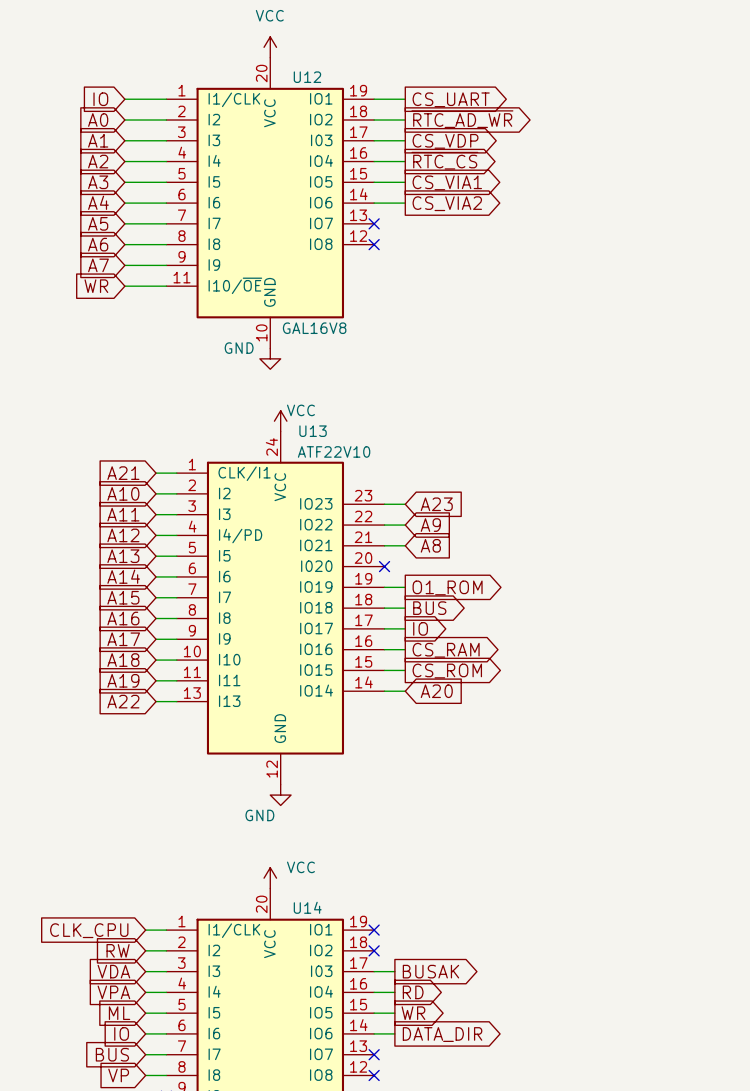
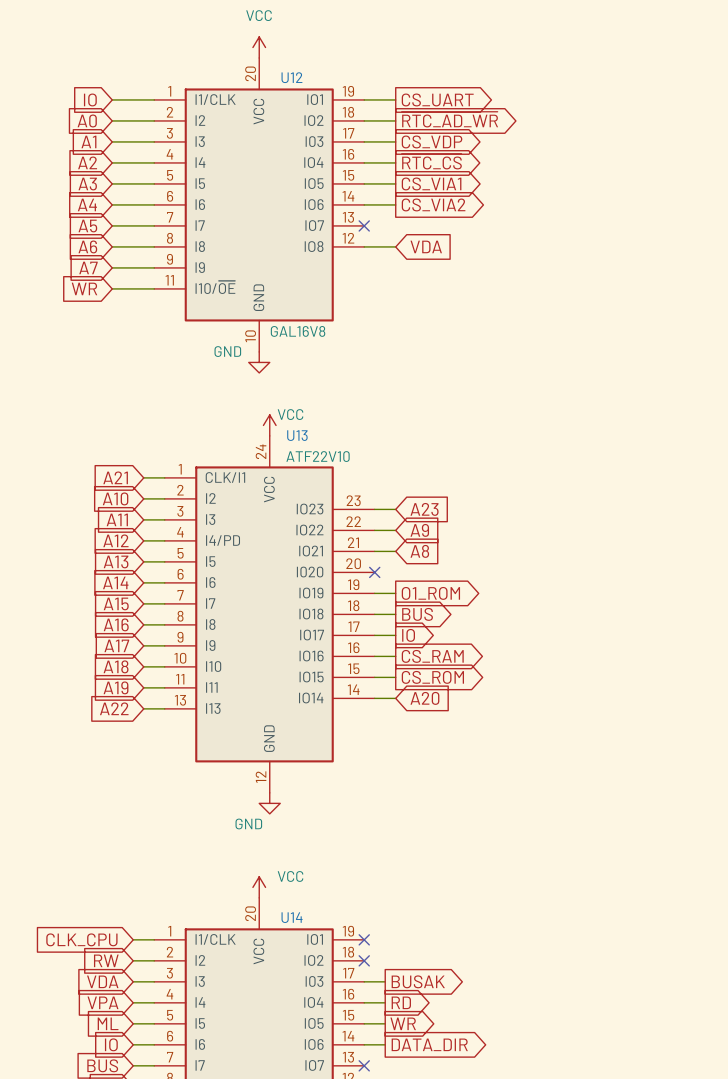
wire: none -> (364, 246) (395, 246)
no-connect mark: (374, 244) -> none
global label: none -> VDA (426, 246)

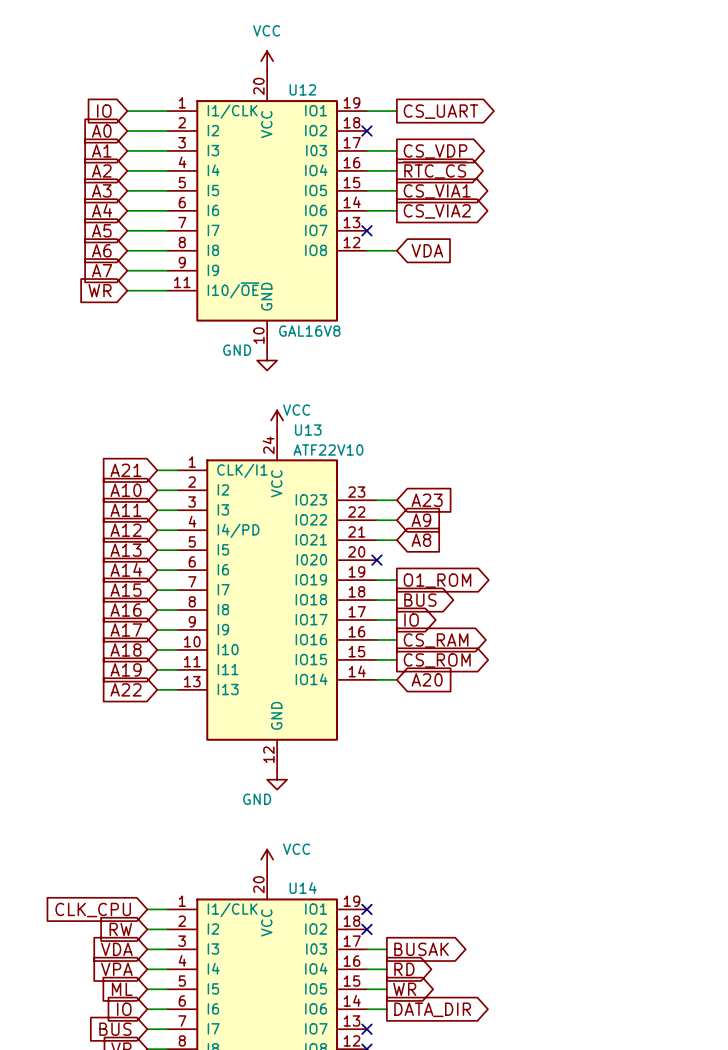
global label: ~{RTC_AD_WR} (449, 119) -> none
wire: (364, 120) (395, 120) -> none
no-connect mark: none -> (366, 131)

